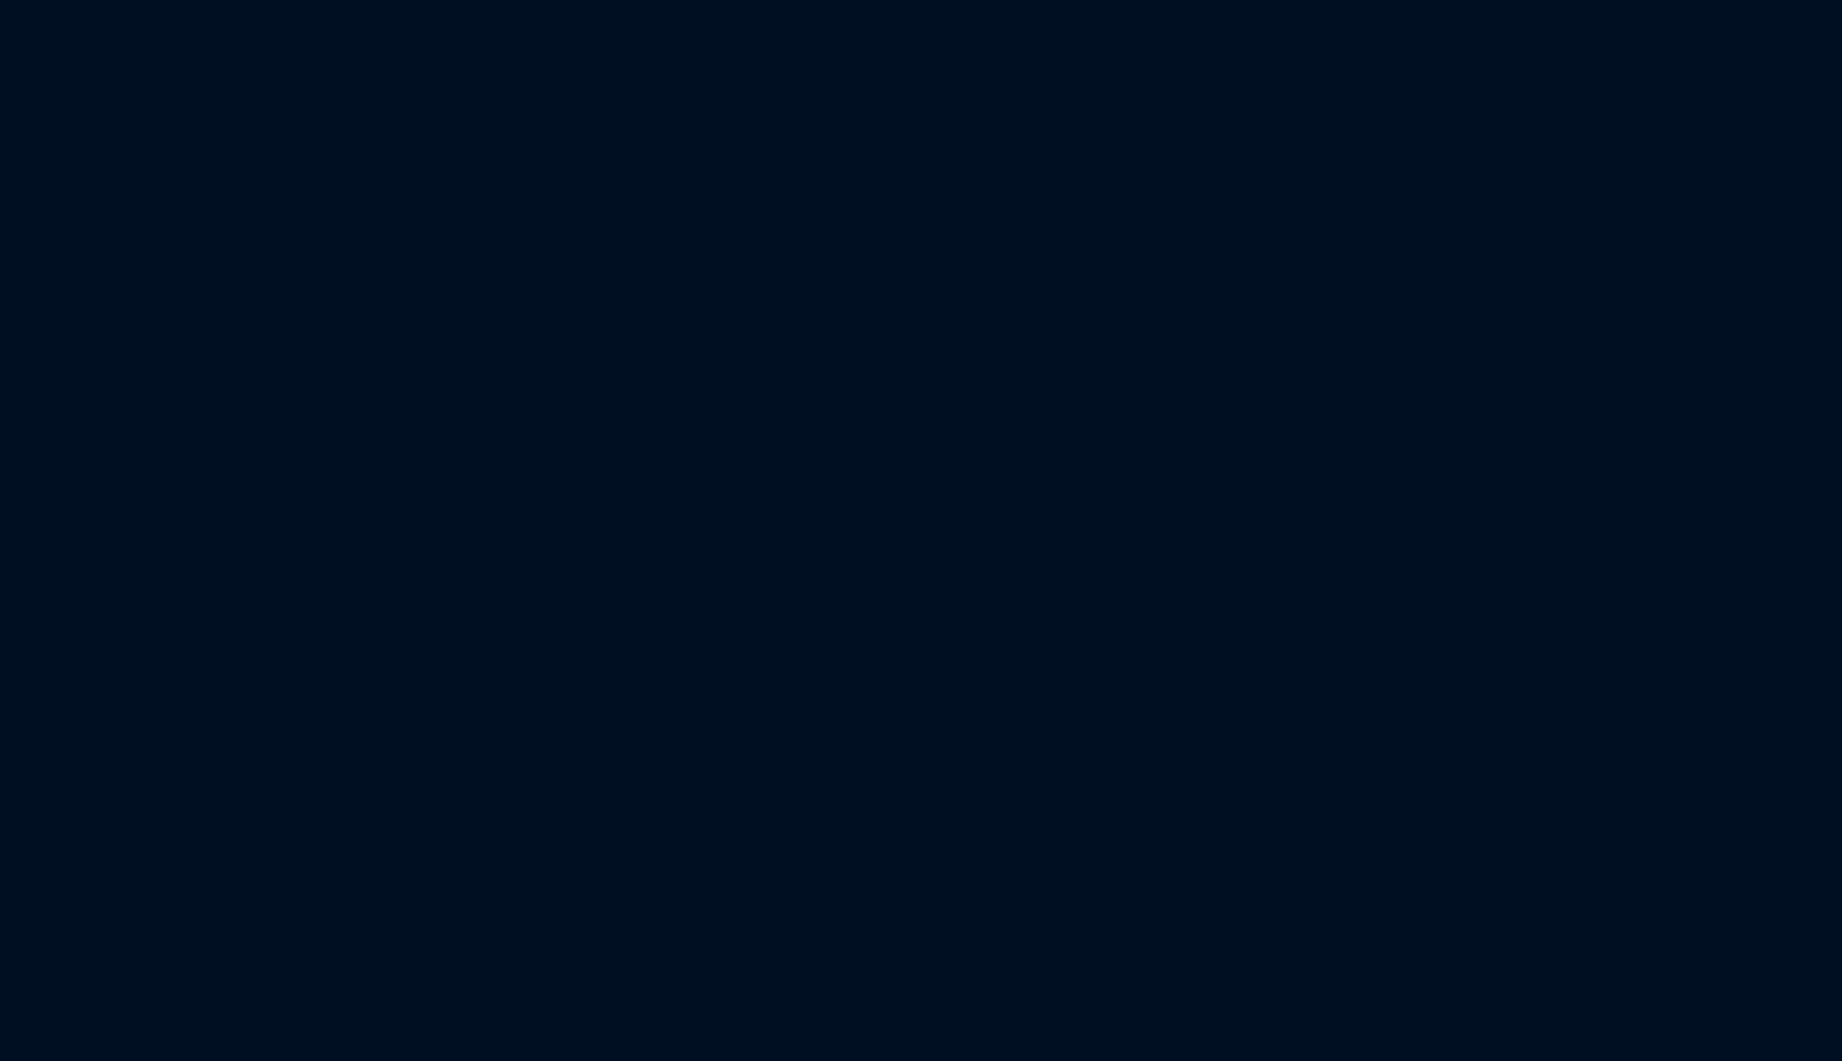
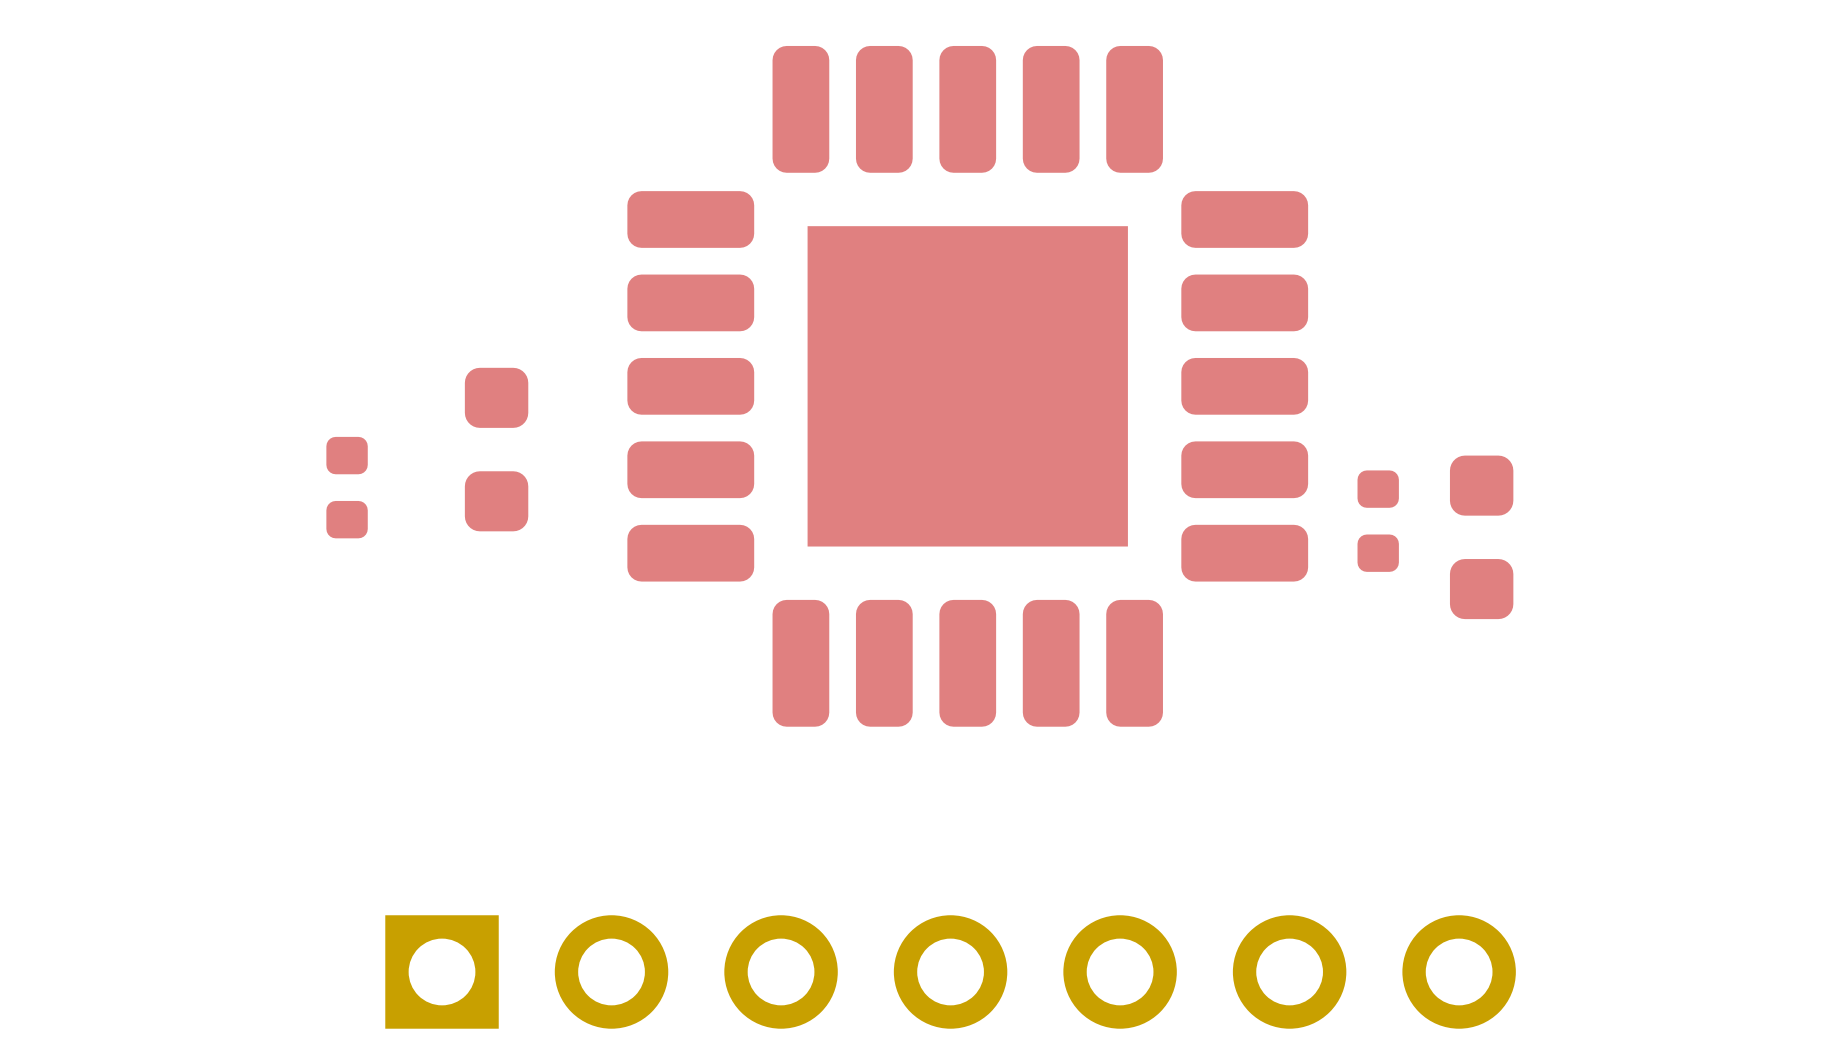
part: none -> (967, 386)
part: none -> (496, 449)
part: none -> (347, 487)
part: none -> (1378, 521)
part: none -> (1481, 537)
part: none -> (950, 971)

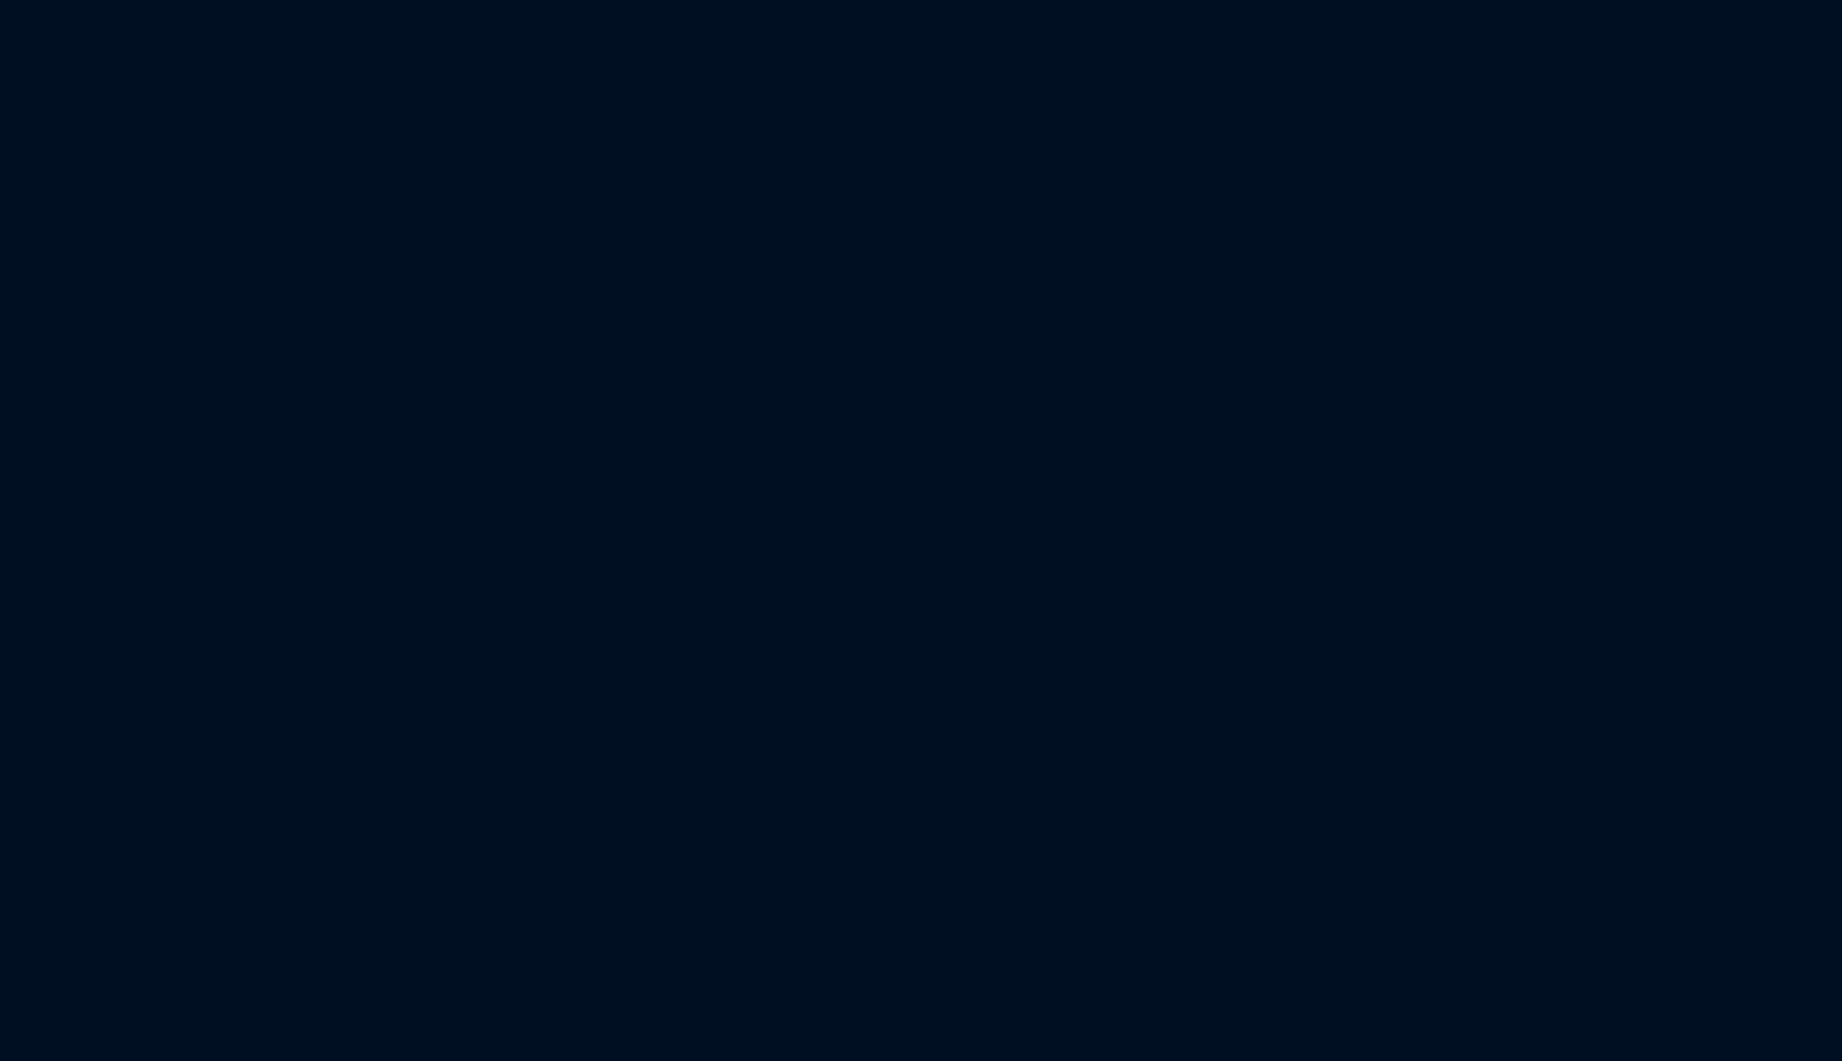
part: (967, 386) -> none
part: (496, 449) -> none
part: (347, 487) -> none
part: (1378, 521) -> none
part: (1481, 537) -> none
part: (950, 971) -> none

